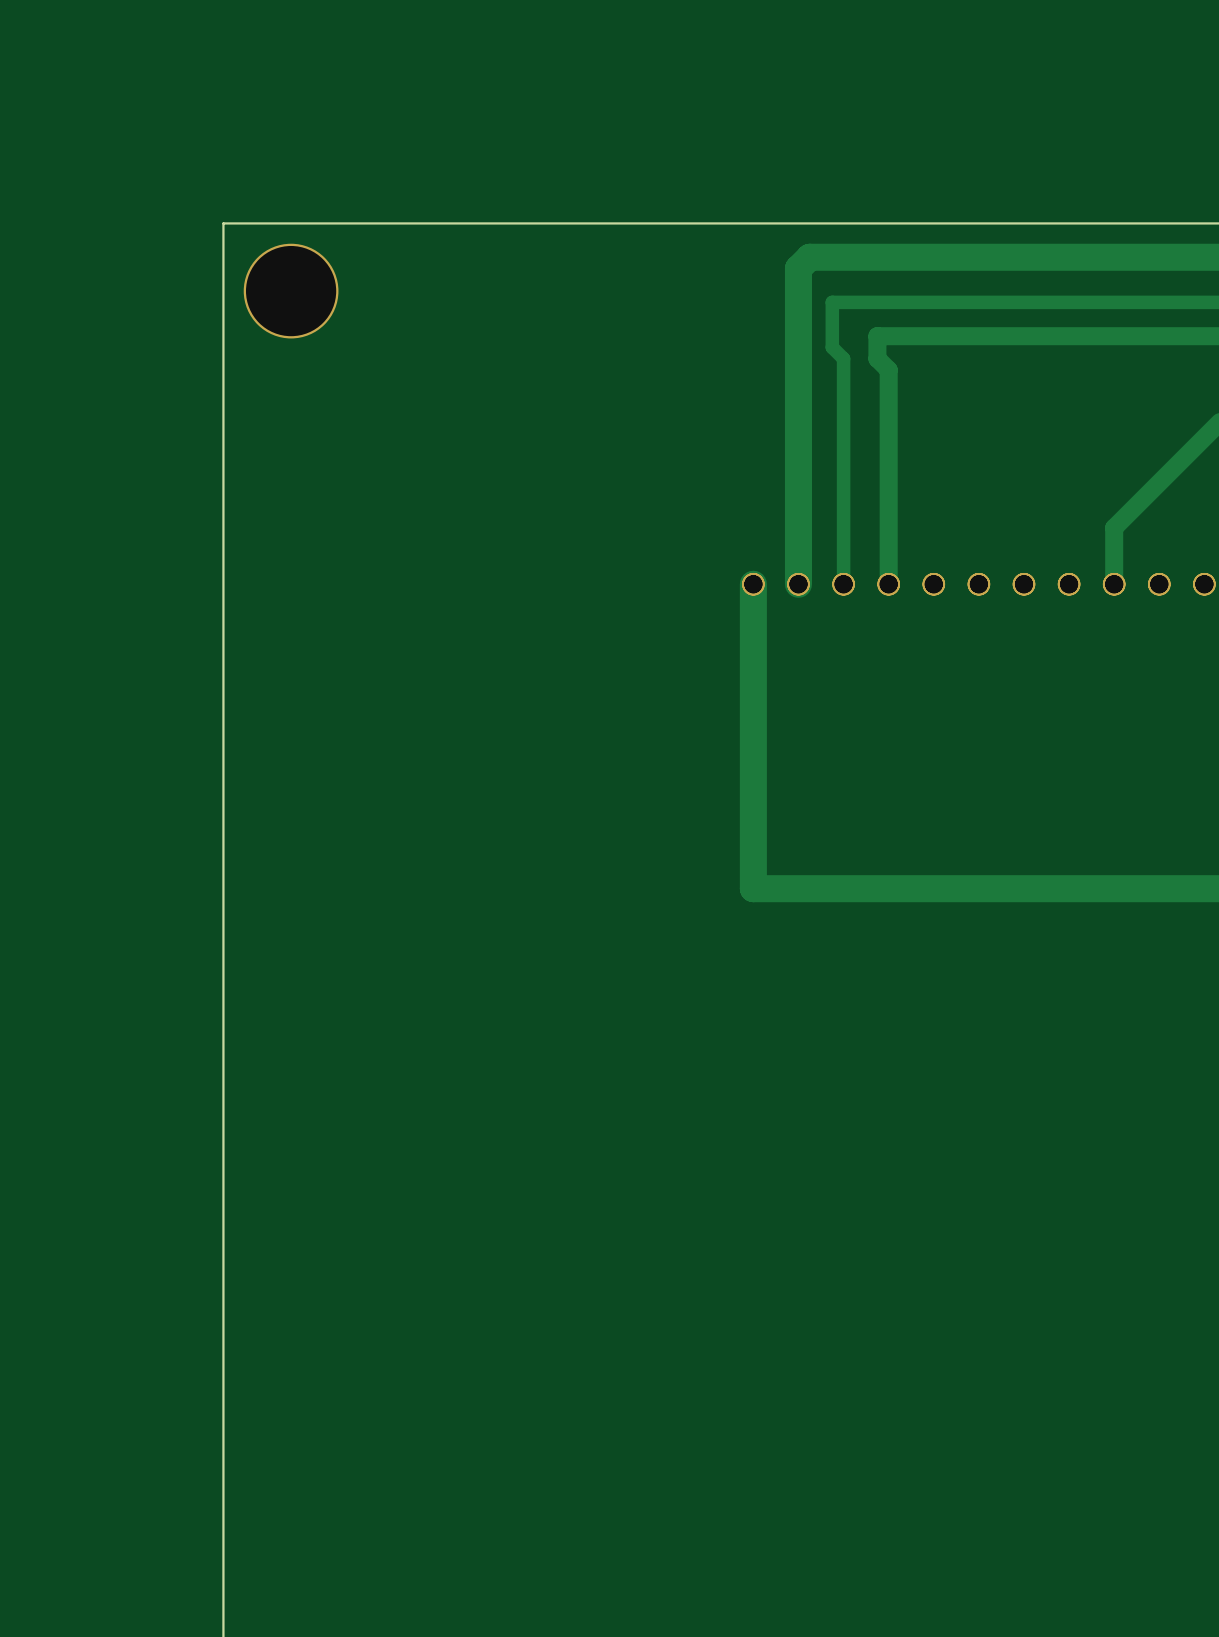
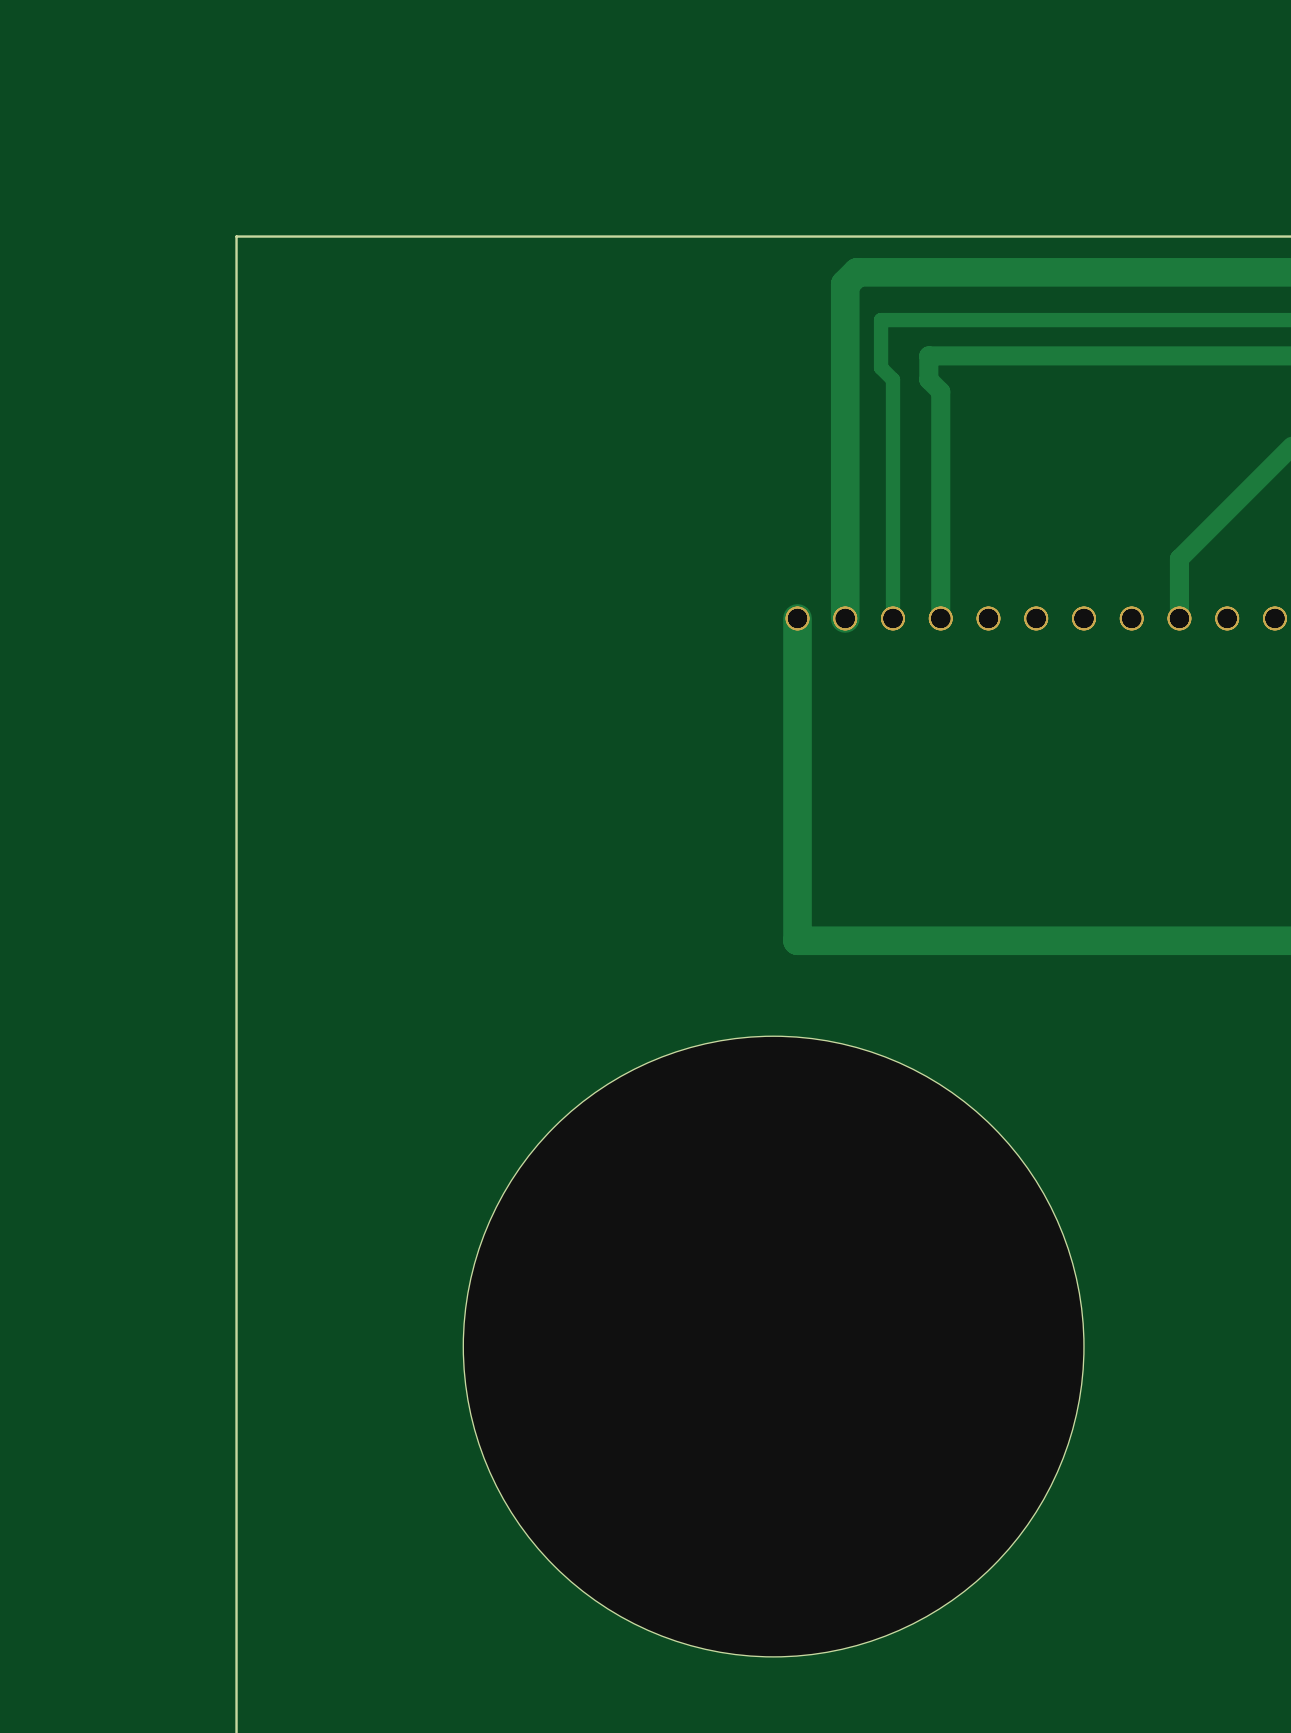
via: (291, 291) -> none
part: none -> (773, 1346)

